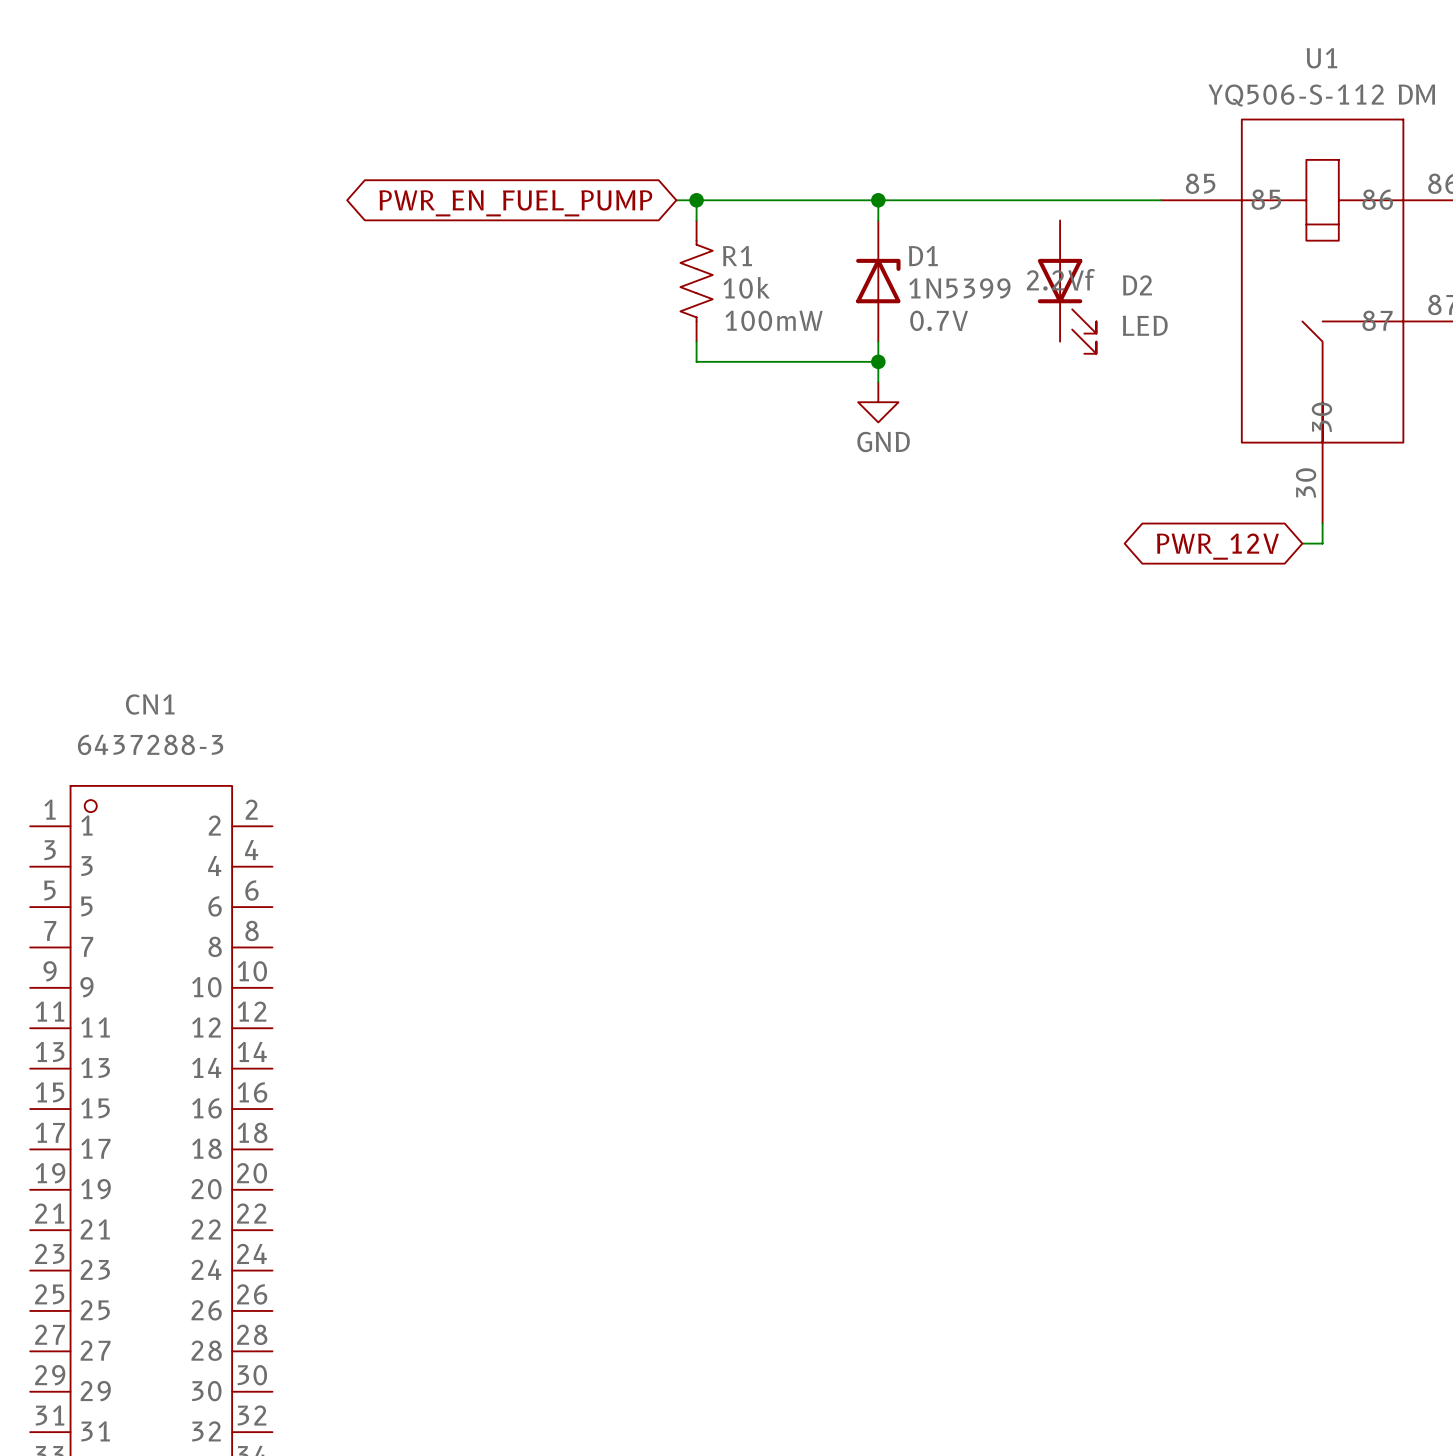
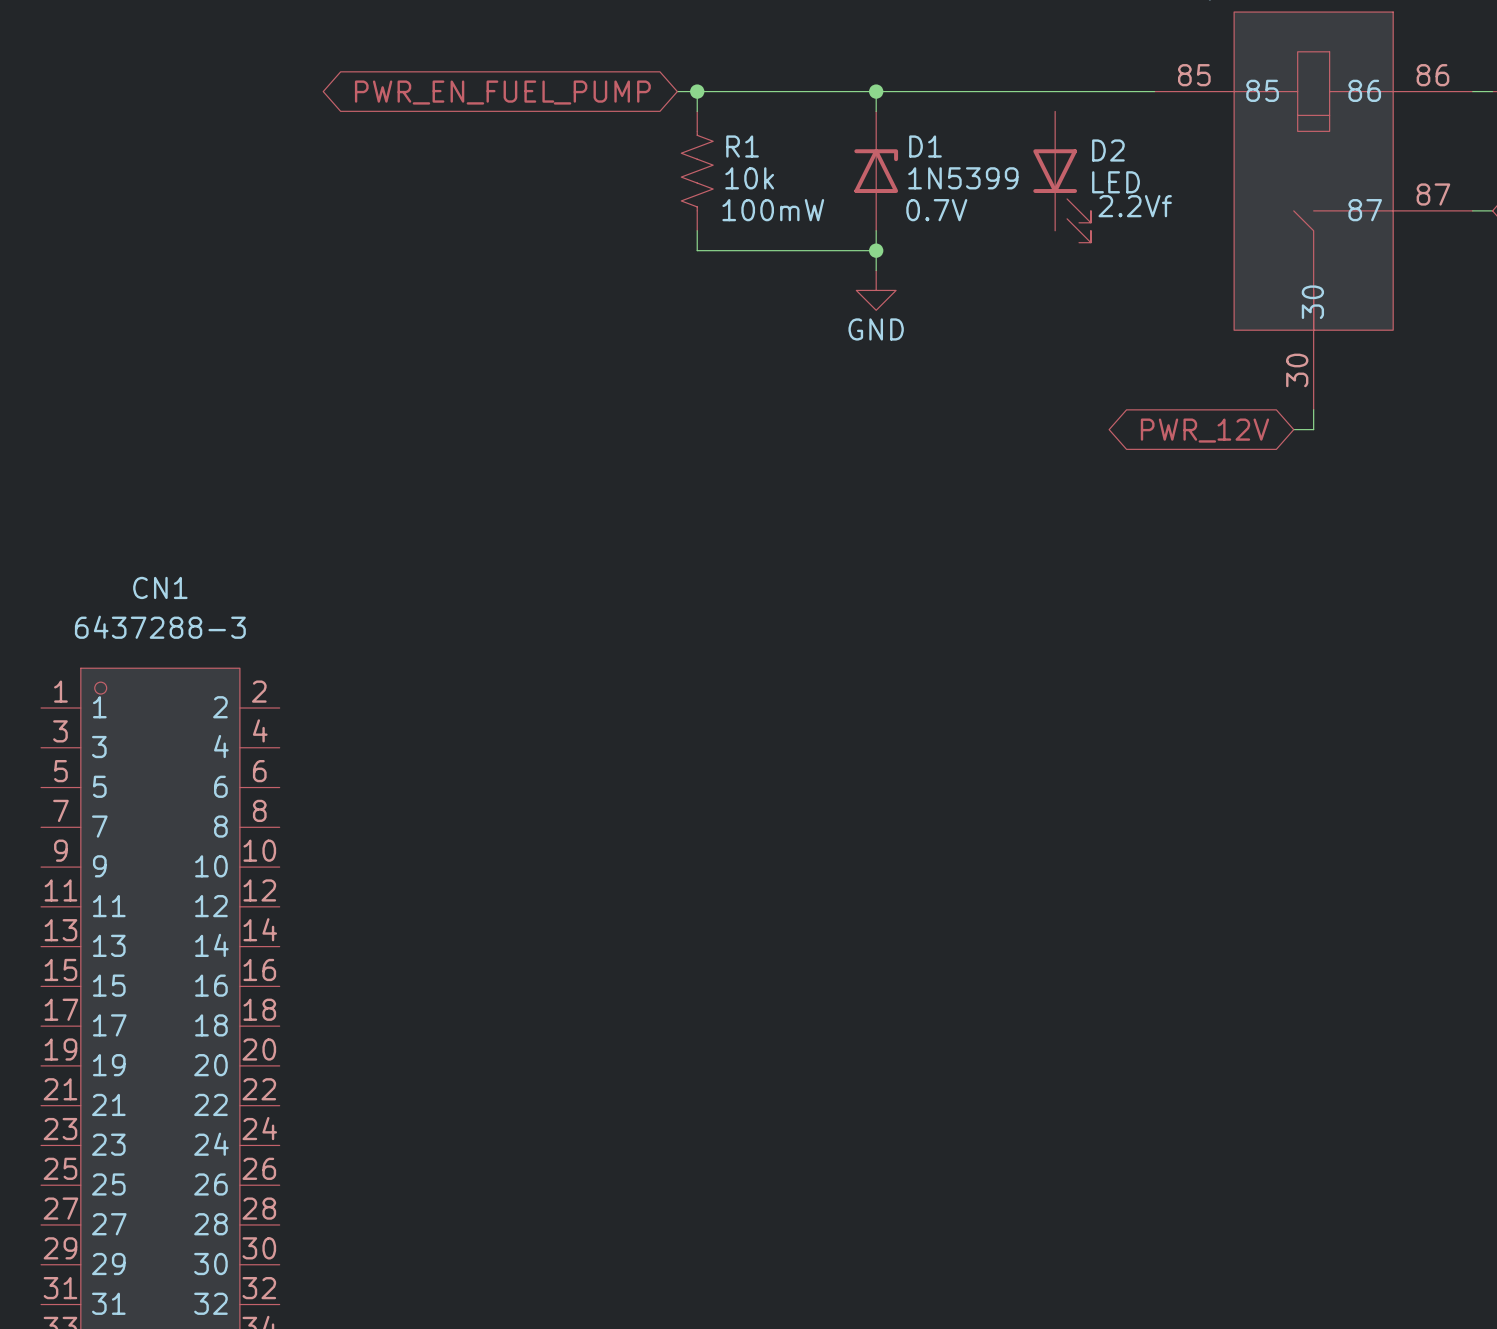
D2 text position: 2.2Vf (1060, 279) -> 2.2Vf (1135, 206)
D2 name position: D2 (1137, 285) -> D2 (1108, 150)
D2 value position: LED (1145, 325) -> LED (1116, 182)

